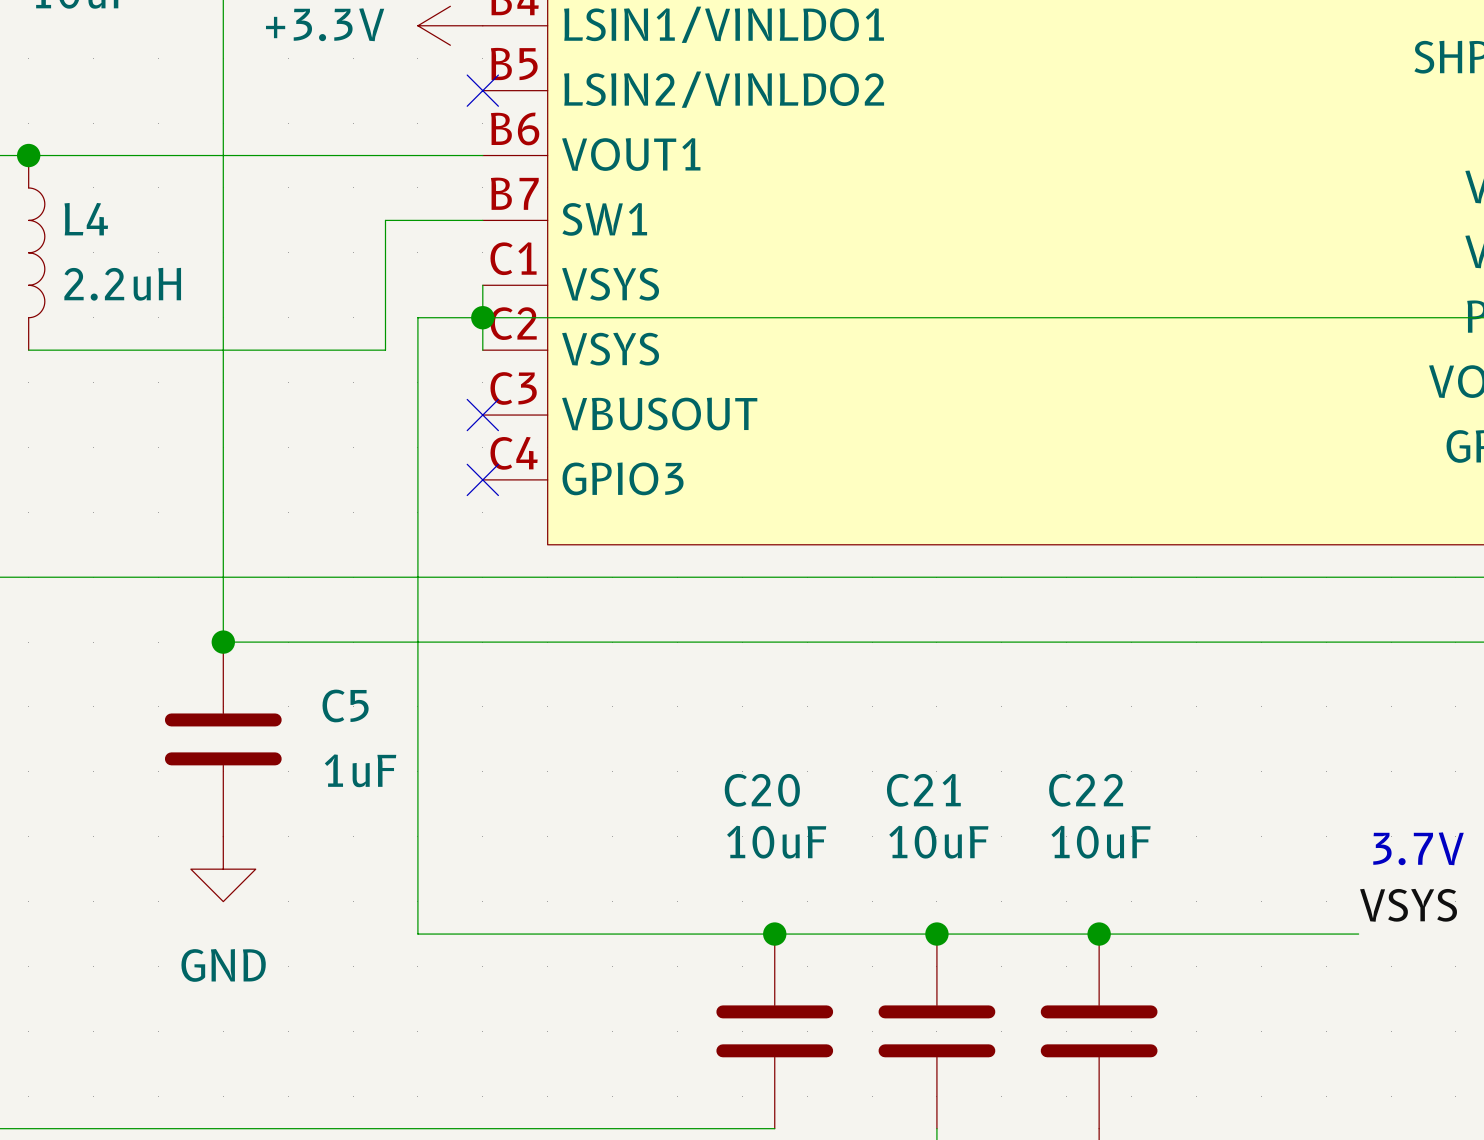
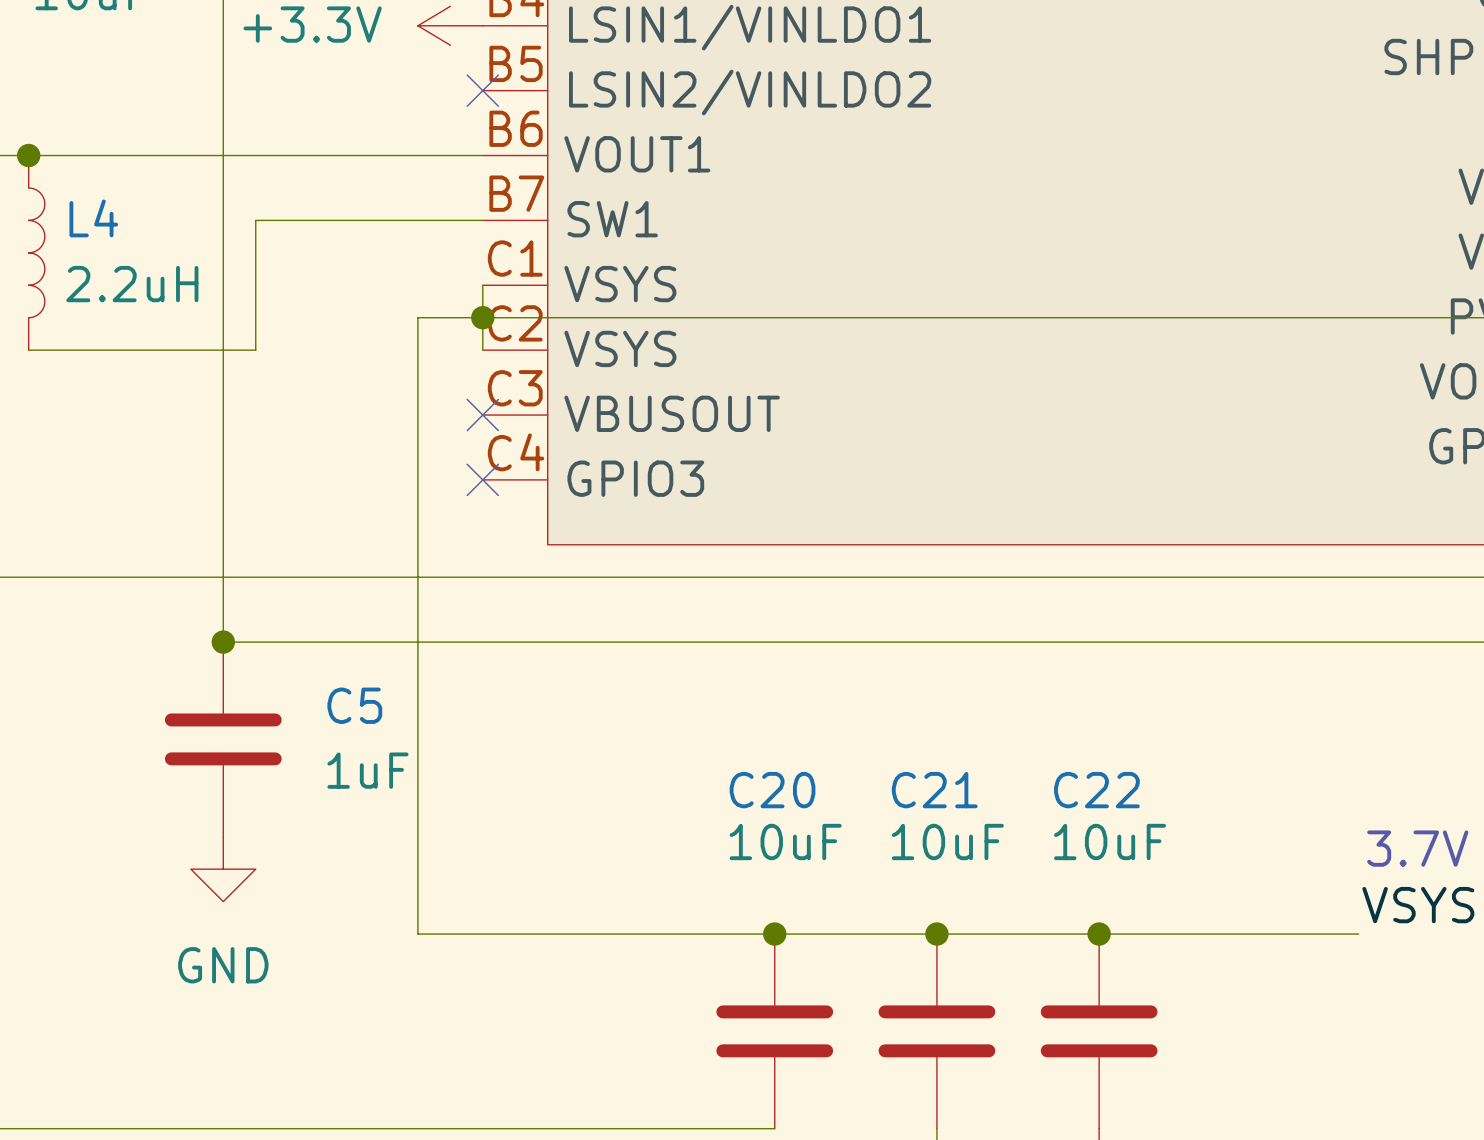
wire: (385, 220) (385, 350) (255, 350) -> (385, 220) (255, 220) (255, 350)

